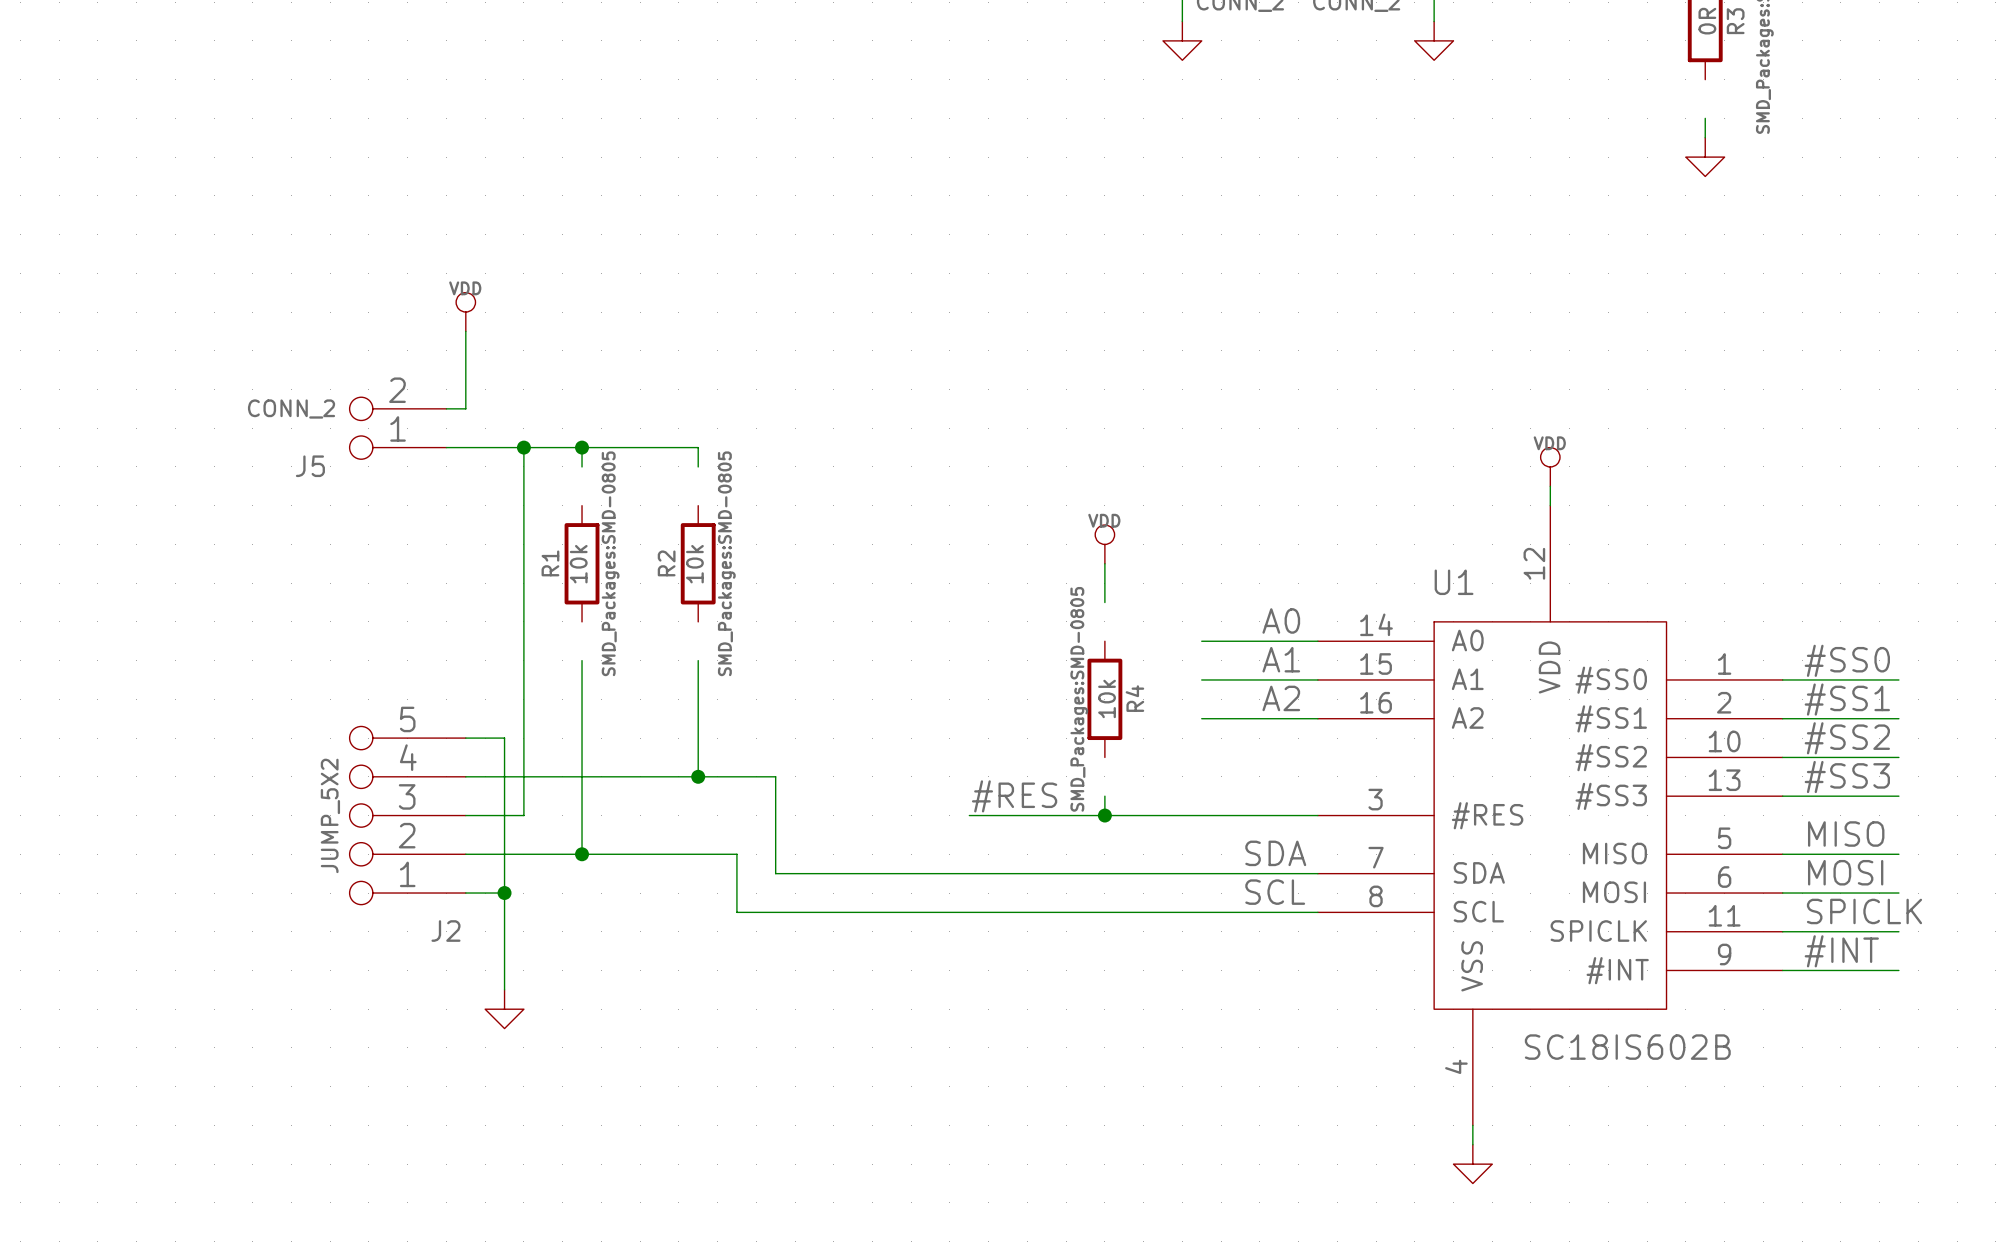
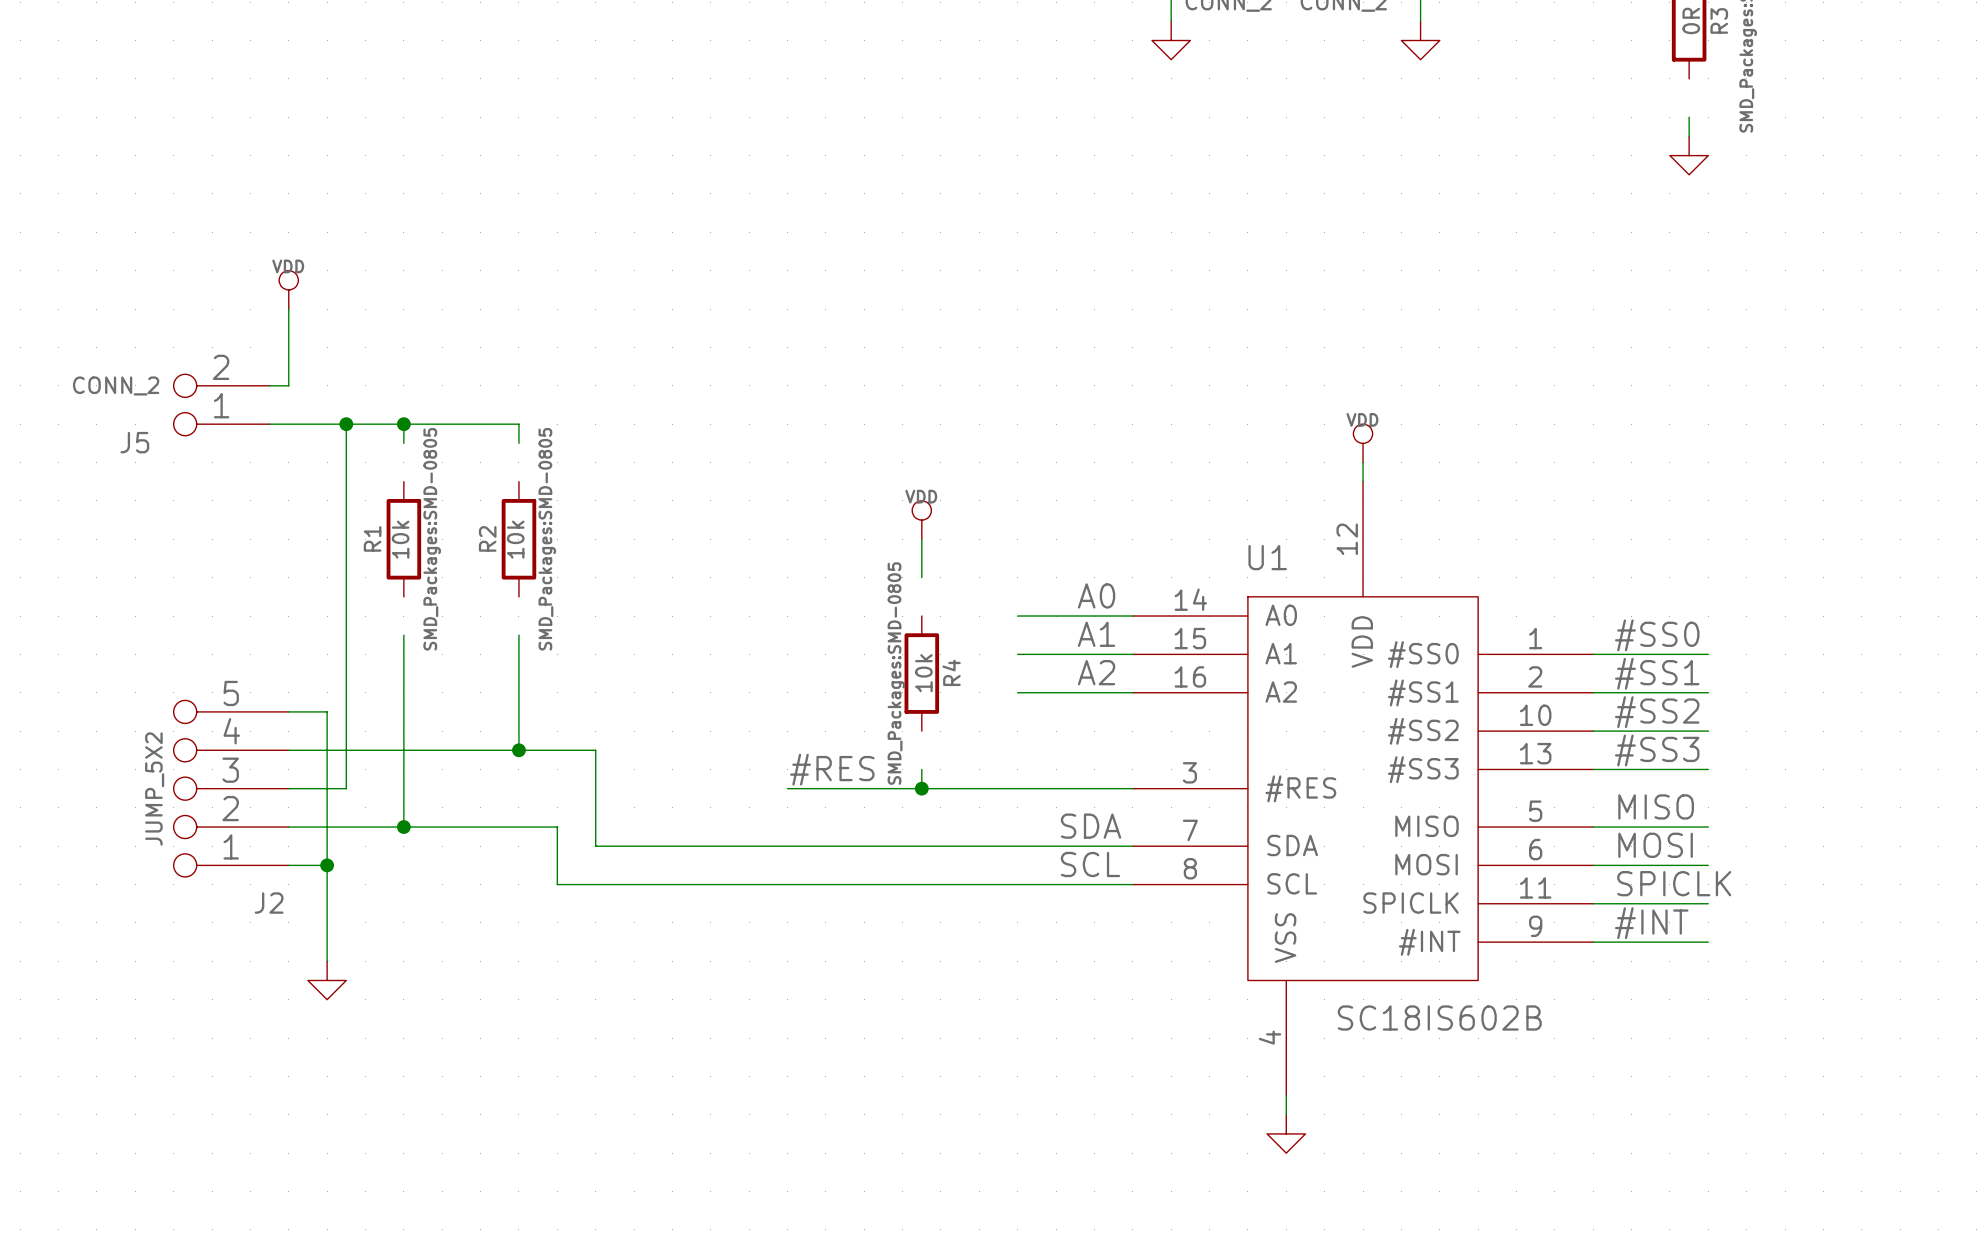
power symbol position: VDD (465, 312) -> VDD (288, 289)
wire: (465, 331) (465, 408) (446, 408) -> (288, 309) (288, 385) (269, 385)
wire: none -> (346, 424) (346, 788) (288, 788)
junction: none -> (346, 424)
J5 position: (398, 428) -> (221, 404)
junction: none -> (403, 424)
wire: (446, 447) (698, 447) (698, 466) -> none
wire: (523, 447) (523, 641) -> (518, 443) (518, 424) (269, 424)
junction: (523, 447) -> none
wire: (582, 447) (582, 466) -> (403, 424) (403, 443)
junction: (582, 447) -> none
power symbol: none -> VDD (1363, 443)
power symbol: VDD (1550, 466) -> none
wire: (1550, 486) (1550, 505) -> (1363, 462) (1363, 481)
power symbol: none -> VDD (921, 520)
power symbol: VDD (1104, 544) -> none
R1 position: (582, 563) -> (403, 539)
R2 position: (698, 563) -> (518, 539)
wire: (1104, 563) (1104, 602) -> (921, 539) (921, 577)
label position: A0 (1281, 620) -> A0 (1096, 595)
wire: (1201, 641) (1317, 641) -> (1017, 616) (1132, 616)
label position: A1 (1281, 659) -> A1 (1096, 634)
wire: (582, 660) (582, 854) -> (403, 635) (403, 827)
wire: (698, 660) (698, 776) -> none
label position: #SS0 (1847, 660) -> #SS0 (1657, 635)
wire: (1201, 679) (1317, 679) -> (1017, 654) (1132, 654)
wire: (1782, 679) (1898, 679) -> (1593, 654) (1708, 654)
label position: A2 (1281, 698) -> A2 (1096, 672)
R4 position: (1104, 699) -> (921, 673)
label position: #SS1 (1847, 699) -> #SS1 (1657, 673)
wire: (1201, 718) (1317, 718) -> (1017, 692) (1132, 692)
wire: (1782, 718) (1898, 718) -> (1593, 692) (1708, 692)
wire: (465, 738) (504, 738) (504, 989) -> (288, 711) (327, 711) (327, 961)
label position: #SS2 (1847, 738) -> #SS2 (1657, 712)
wire: (523, 757) (523, 815) (465, 815) -> none
junction: none -> (518, 750)
wire: (1782, 757) (1898, 757) -> (1593, 731) (1708, 731)
wire: (465, 776) (775, 776) (775, 873) (1317, 873) -> none
junction: (698, 776) -> none
label position: #SS3 (1847, 777) -> #SS3 (1657, 750)
junction: none -> (921, 788)
label position: #RES (1014, 796) -> #RES (832, 769)
wire: (1104, 796) (1104, 815) -> (921, 769) (921, 788)
wire: (1782, 796) (1898, 796) -> (1593, 769) (1708, 769)
J2 position: (407, 815) -> (231, 788)
wire: (969, 815) (1317, 815) -> (787, 788) (1132, 788)
junction: (1104, 815) -> none
U1 position: (1550, 815) -> (1363, 788)
wire: none -> (288, 827) (557, 827) (557, 884) (1132, 884)
junction: none -> (403, 827)
label position: MISO (1846, 834) -> MISO (1656, 806)
label position: SDA (1275, 853) -> SDA (1091, 826)
wire: (465, 854) (601, 854) -> (288, 750) (595, 750) (595, 846)
junction: (582, 854) -> none
wire: (736, 854) (736, 912) (1317, 912) -> (729, 846) (1132, 846)
wire: (1782, 854) (1898, 854) -> (1593, 827) (1708, 827)
label position: MOSI (1845, 872) -> MOSI (1655, 845)
junction: none -> (327, 865)
label position: SCL (1275, 892) -> SCL (1090, 864)
wire: (465, 893) (504, 893) -> (288, 865) (327, 865)
junction: (504, 893) -> none
wire: (1782, 893) (1898, 893) -> (1593, 865) (1708, 865)
label position: SPICLK (1864, 911) -> SPICLK (1674, 883)
wire: (1782, 931) (1898, 931) -> (1593, 903) (1708, 903)
label position: #INT (1841, 951) -> #INT (1651, 923)
wire: (1782, 970) (1898, 970) -> (1593, 942) (1708, 942)
power symbol position: (504, 1009) -> (327, 980)
wire: (1472, 1125) (1472, 1144) -> (1286, 1095) (1286, 1114)
power symbol position: (1472, 1164) -> (1286, 1133)

